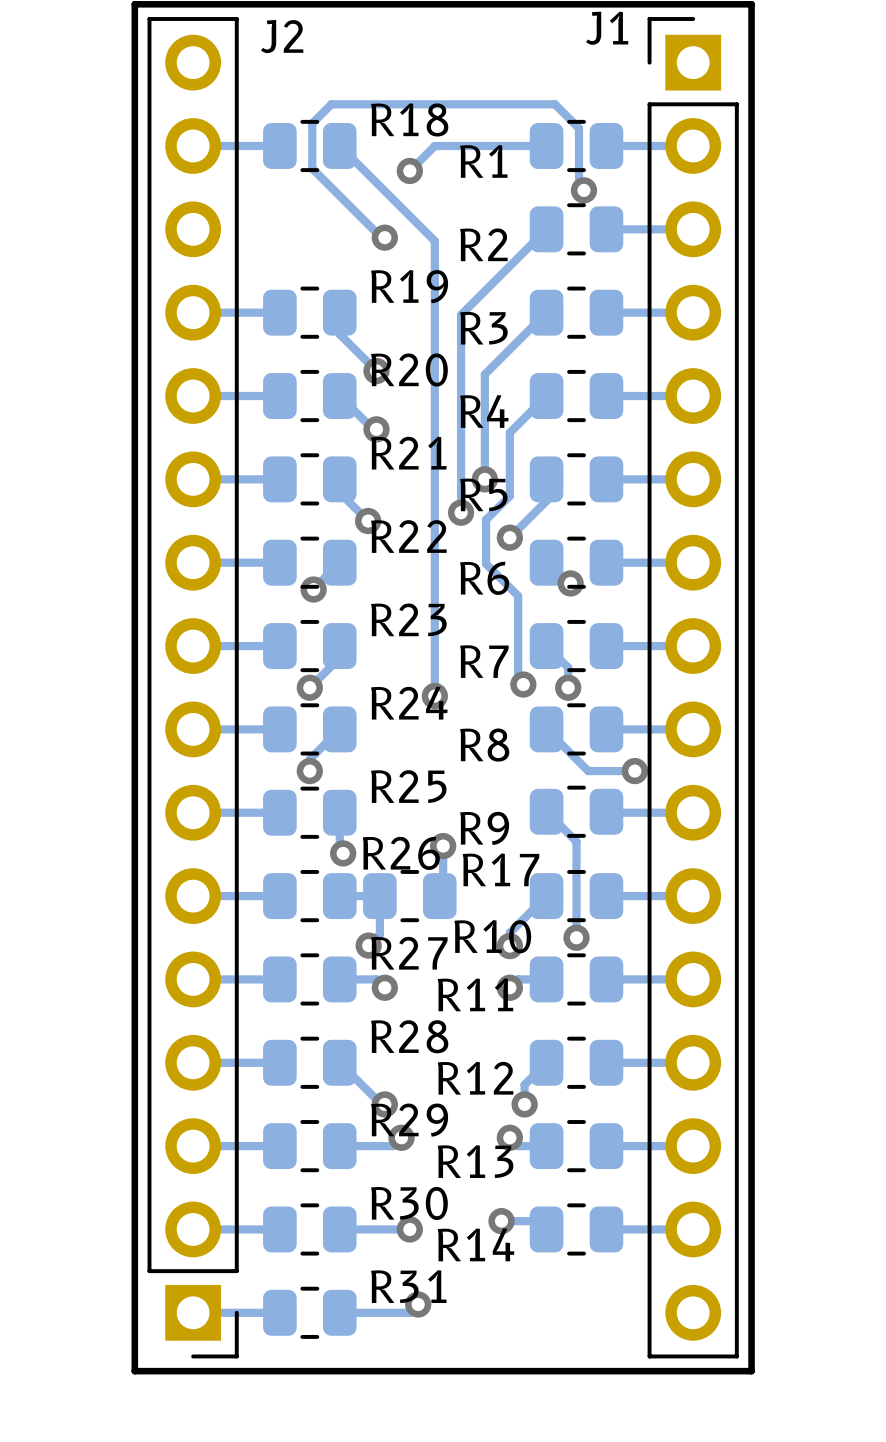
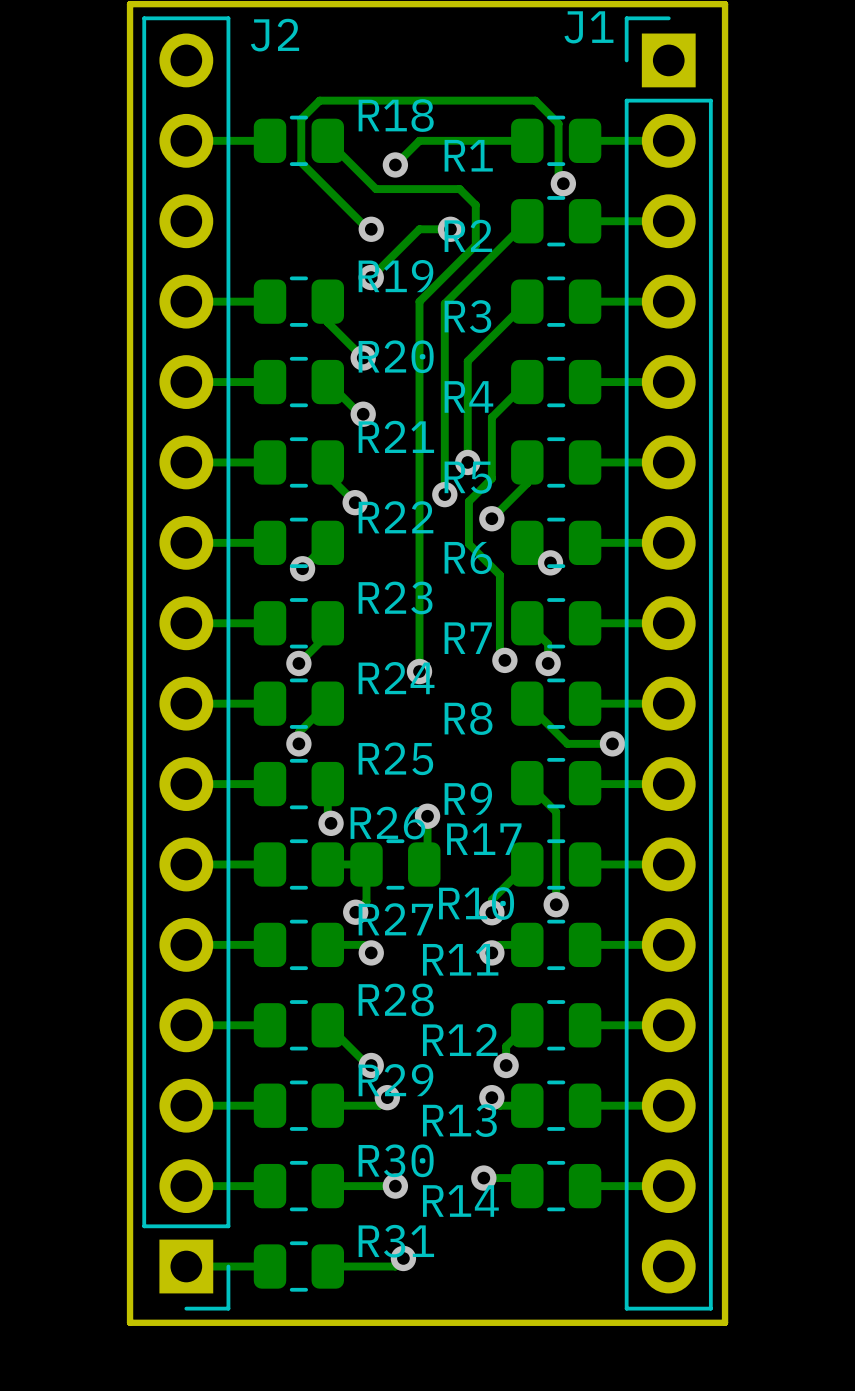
track: (389, 195) (434, 241) (434, 312) -> (376, 189) (459, 189) (475, 205) (475, 245) (419, 301)
track: none -> (450, 229) (419, 229) (371, 277)
via: none -> (450, 229)
via: none -> (371, 277)

